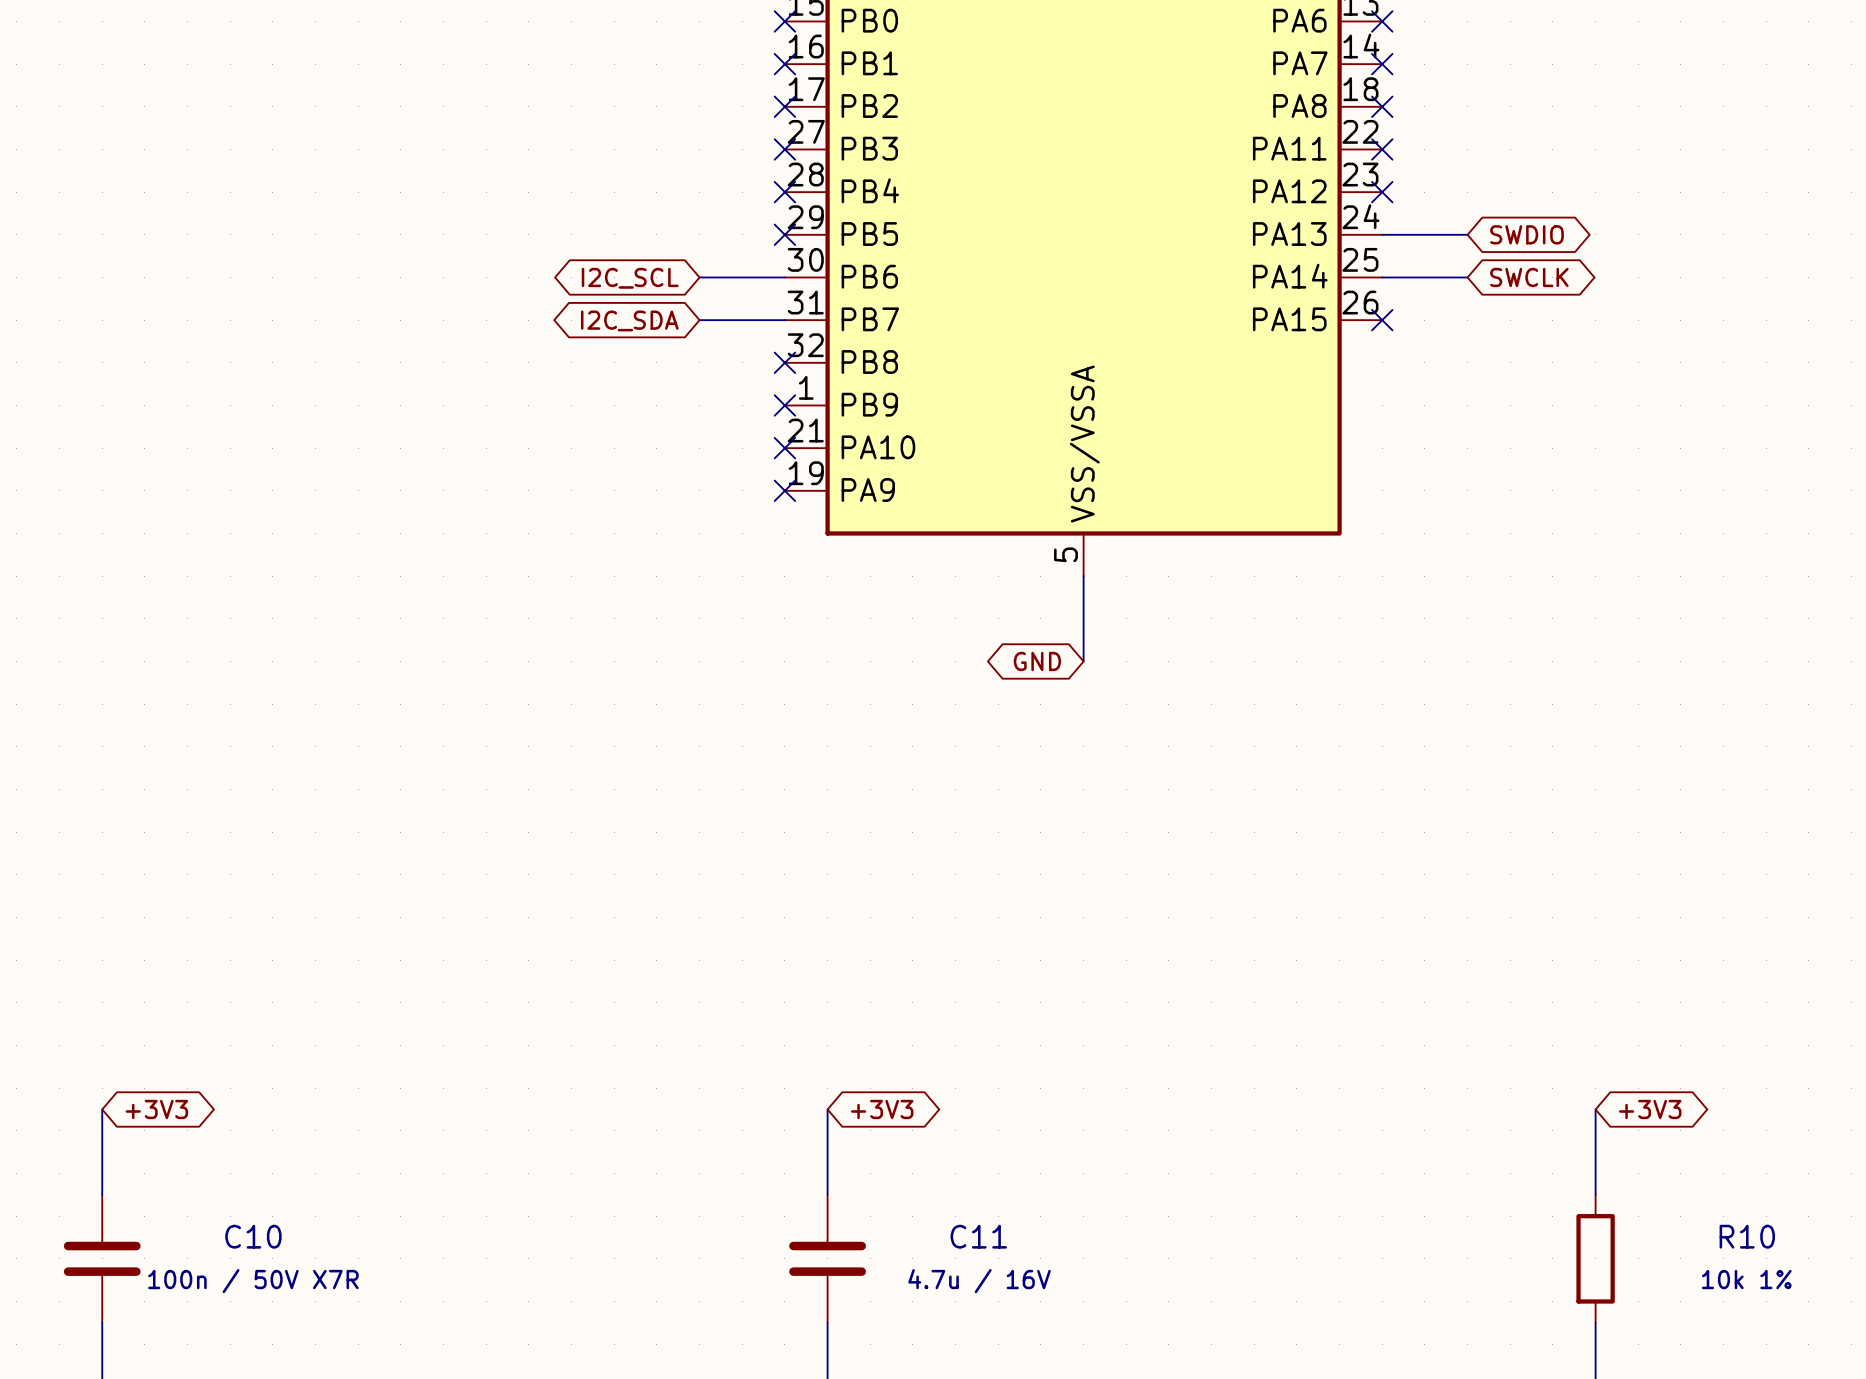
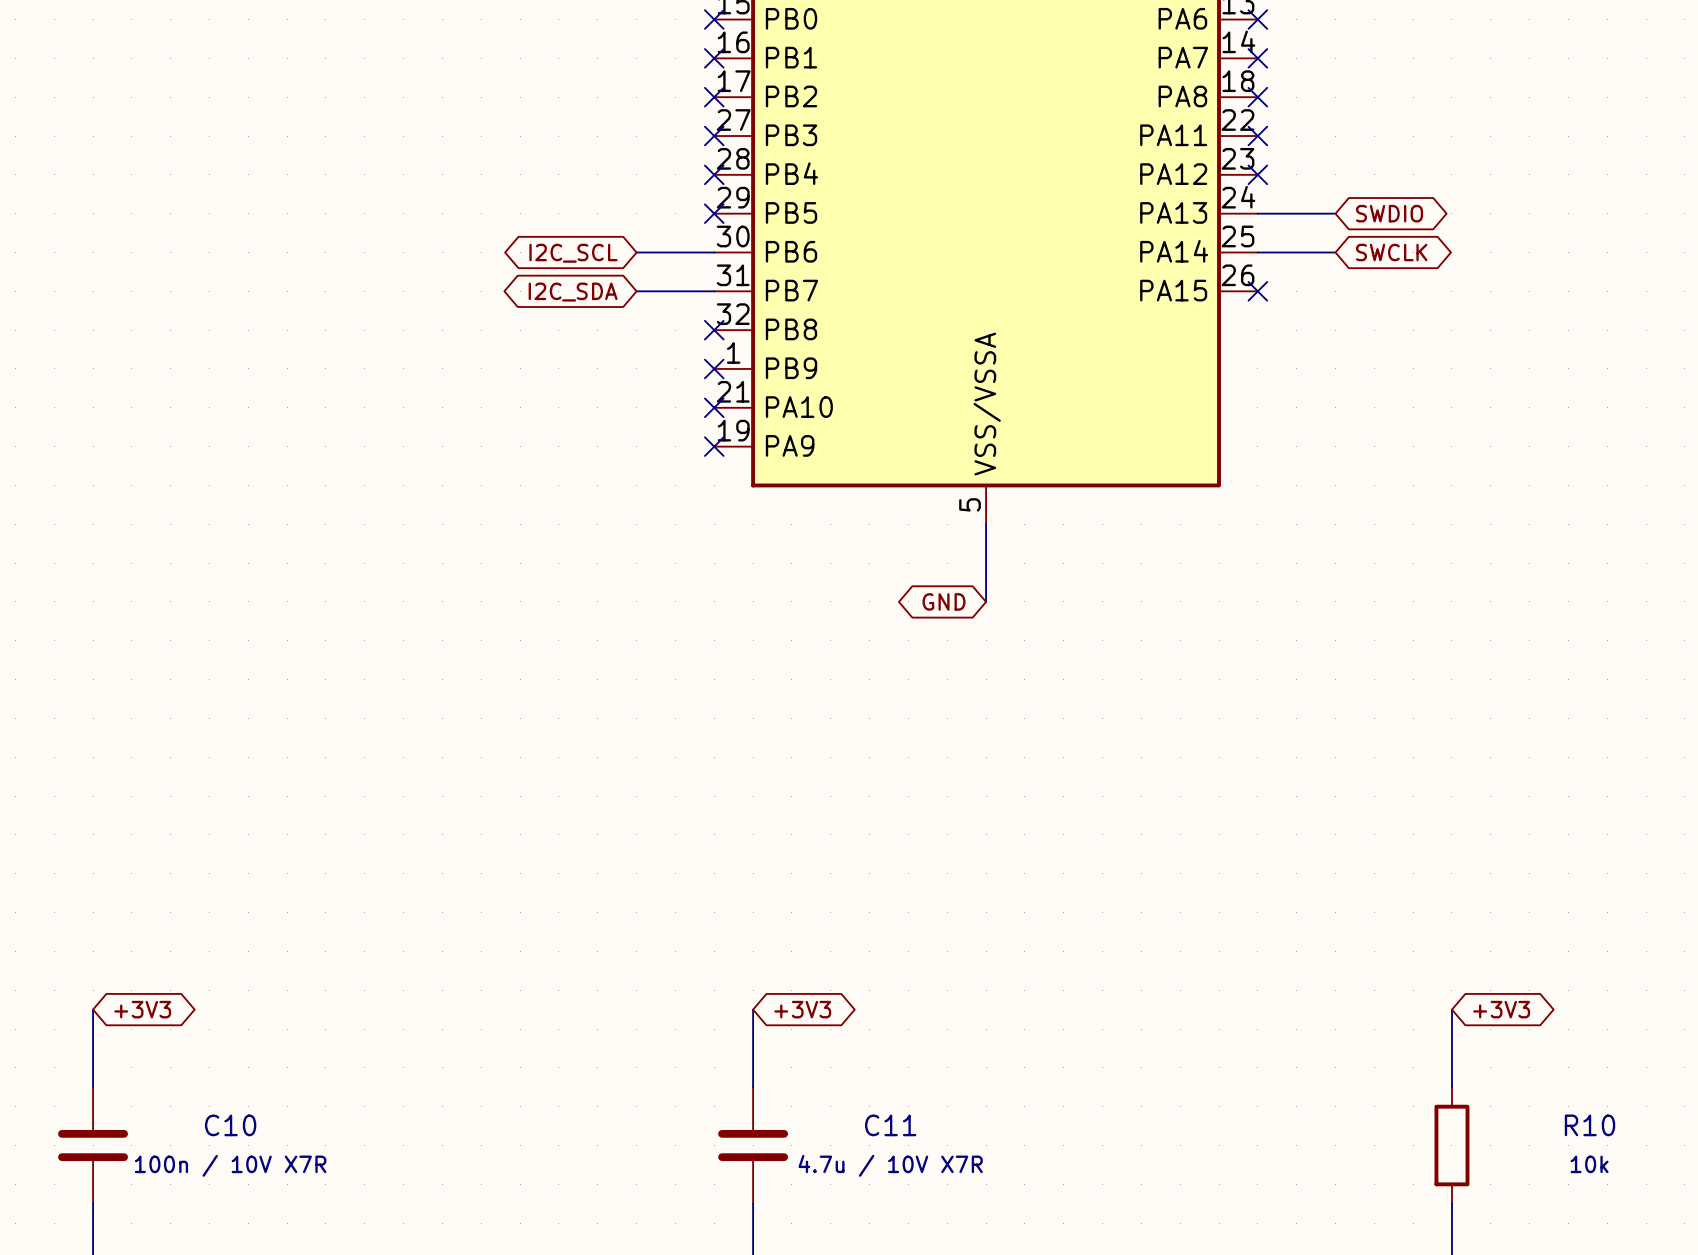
R10 value: 10k 1% (1746, 1279) -> 10k (1589, 1164)
C10 value: 100n / 50V X7R (253, 1281) -> 100n / 10V X7R (230, 1165)
C11 value: 4.7u / 16V (979, 1281) -> 4.7u / 10V X7R (890, 1165)

